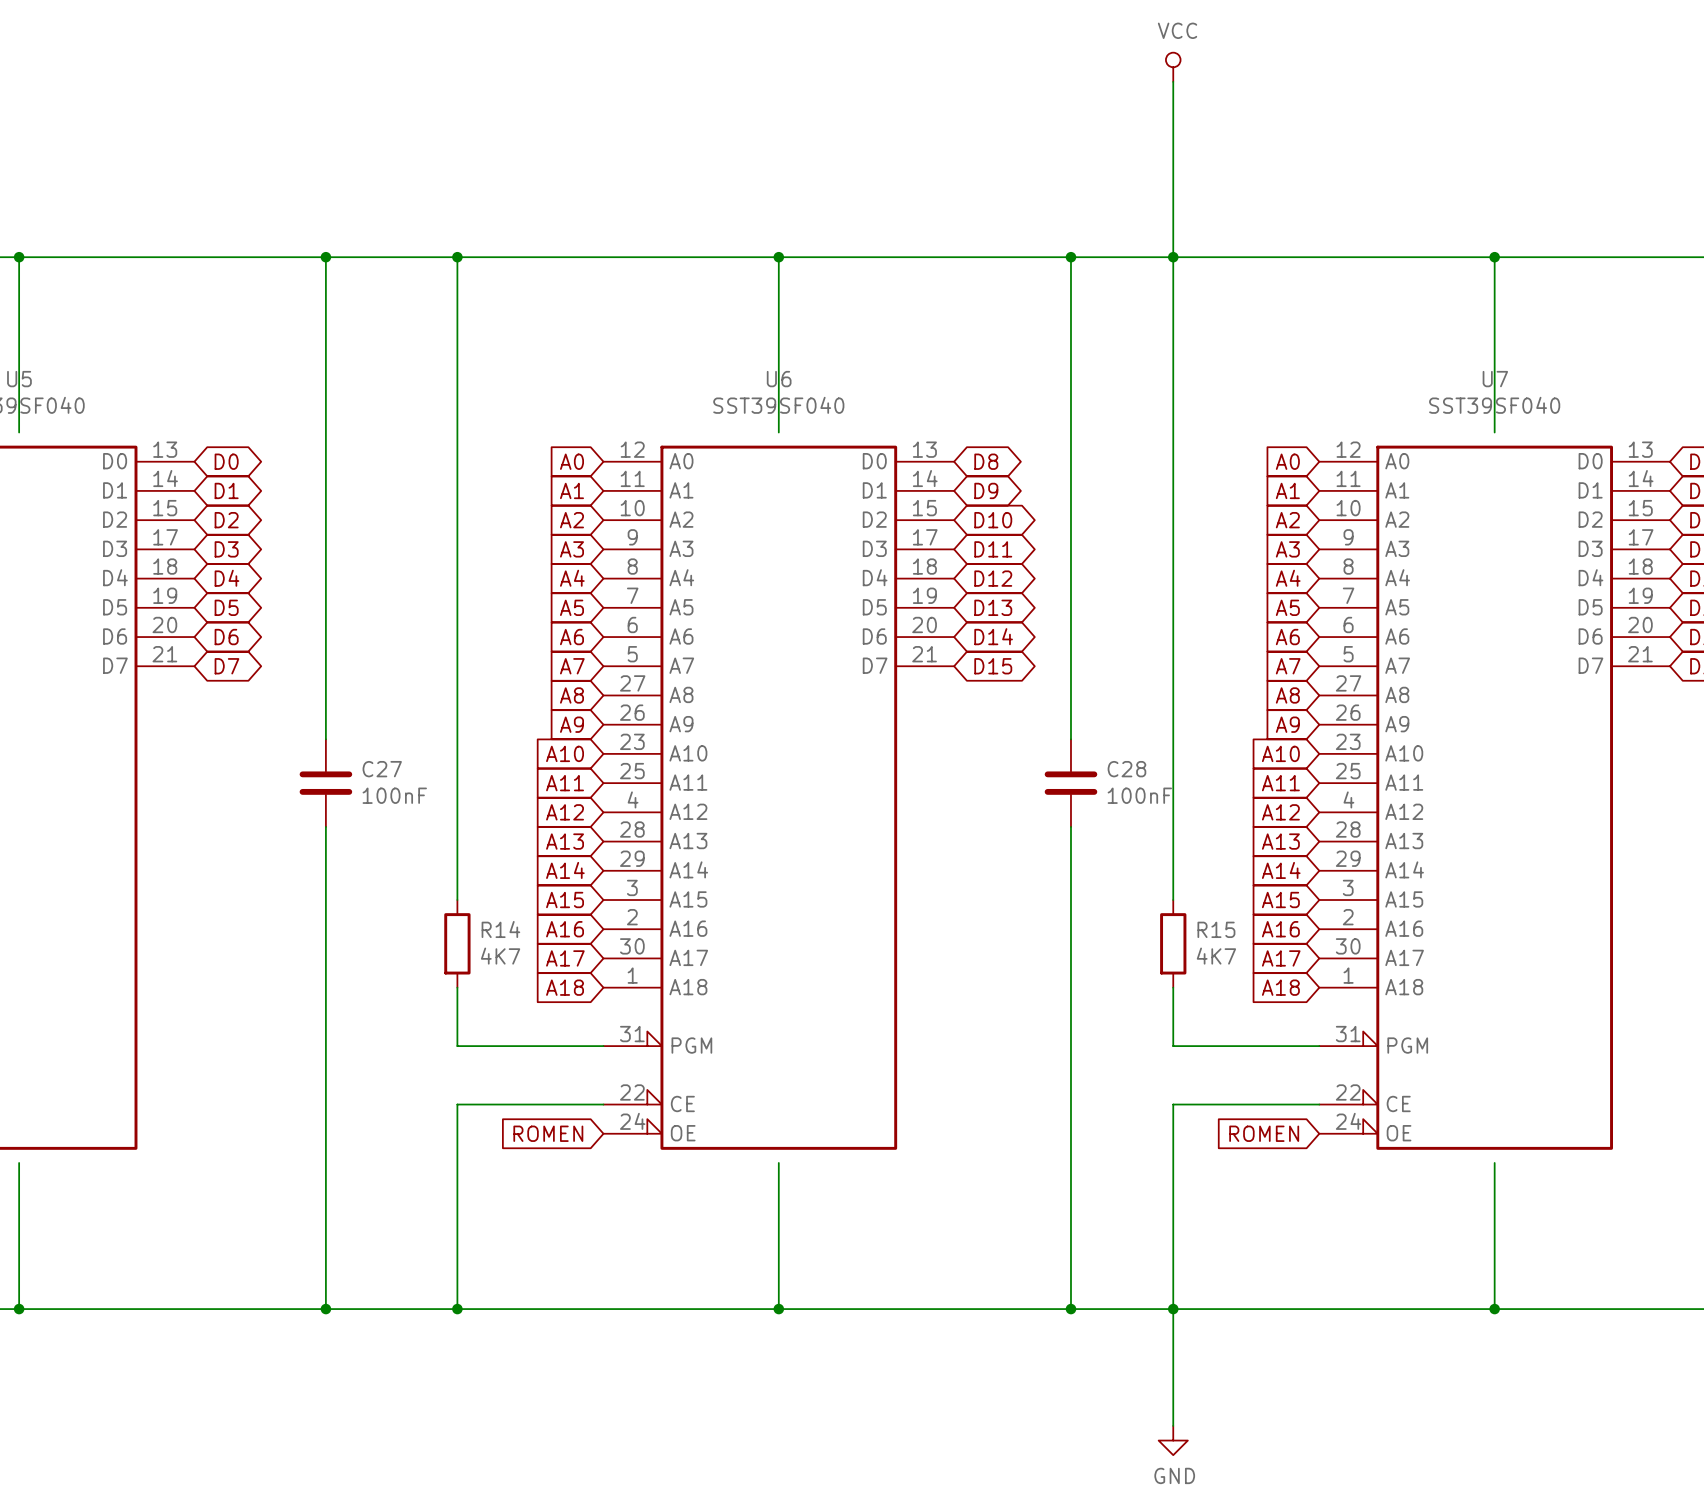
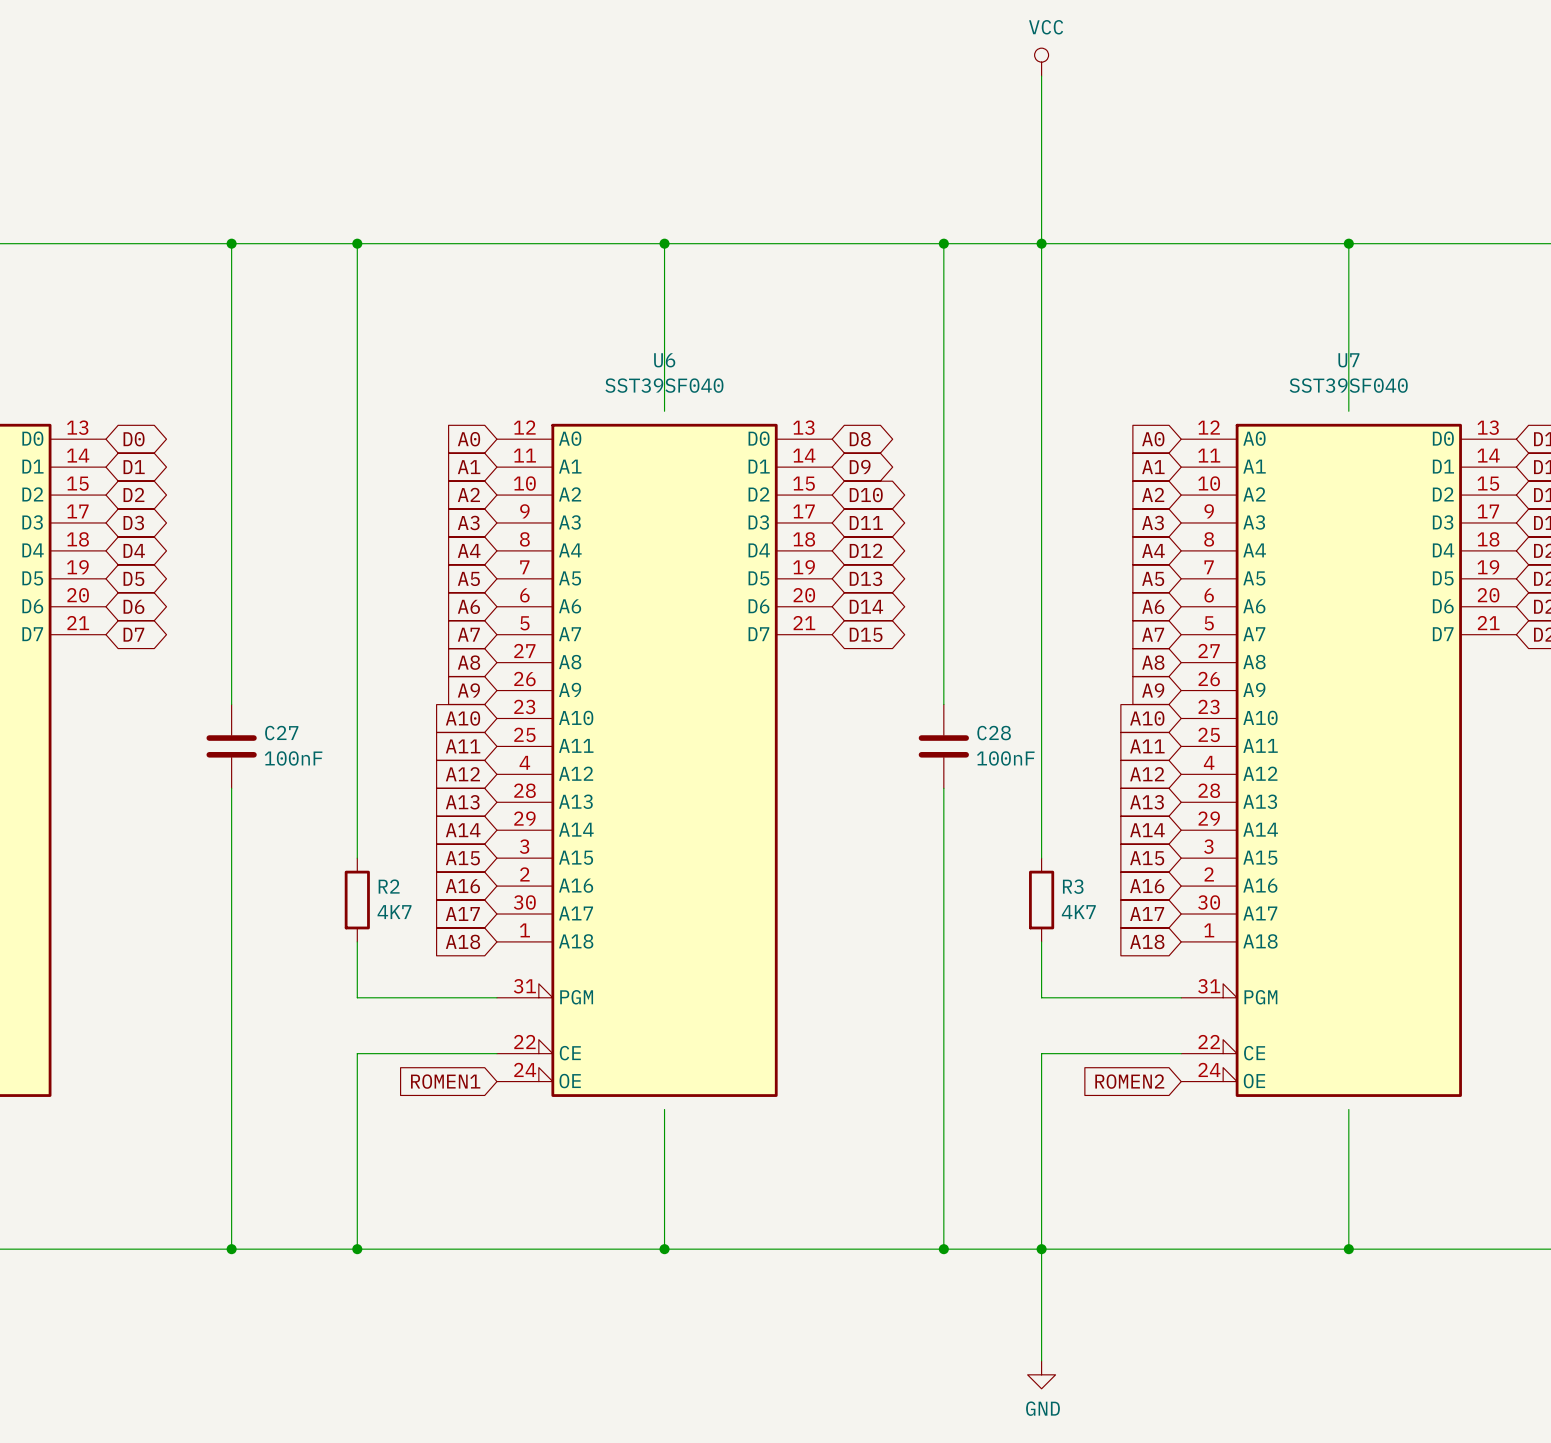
R14 name: R14 (500, 929) -> R2 (389, 886)
R15 name: R15 (1216, 929) -> R3 (1073, 886)
global label: ROMEN (548, 1133) -> ROMEN1 (445, 1081)
global label: ROMEN (1264, 1133) -> ROMEN2 (1129, 1081)

